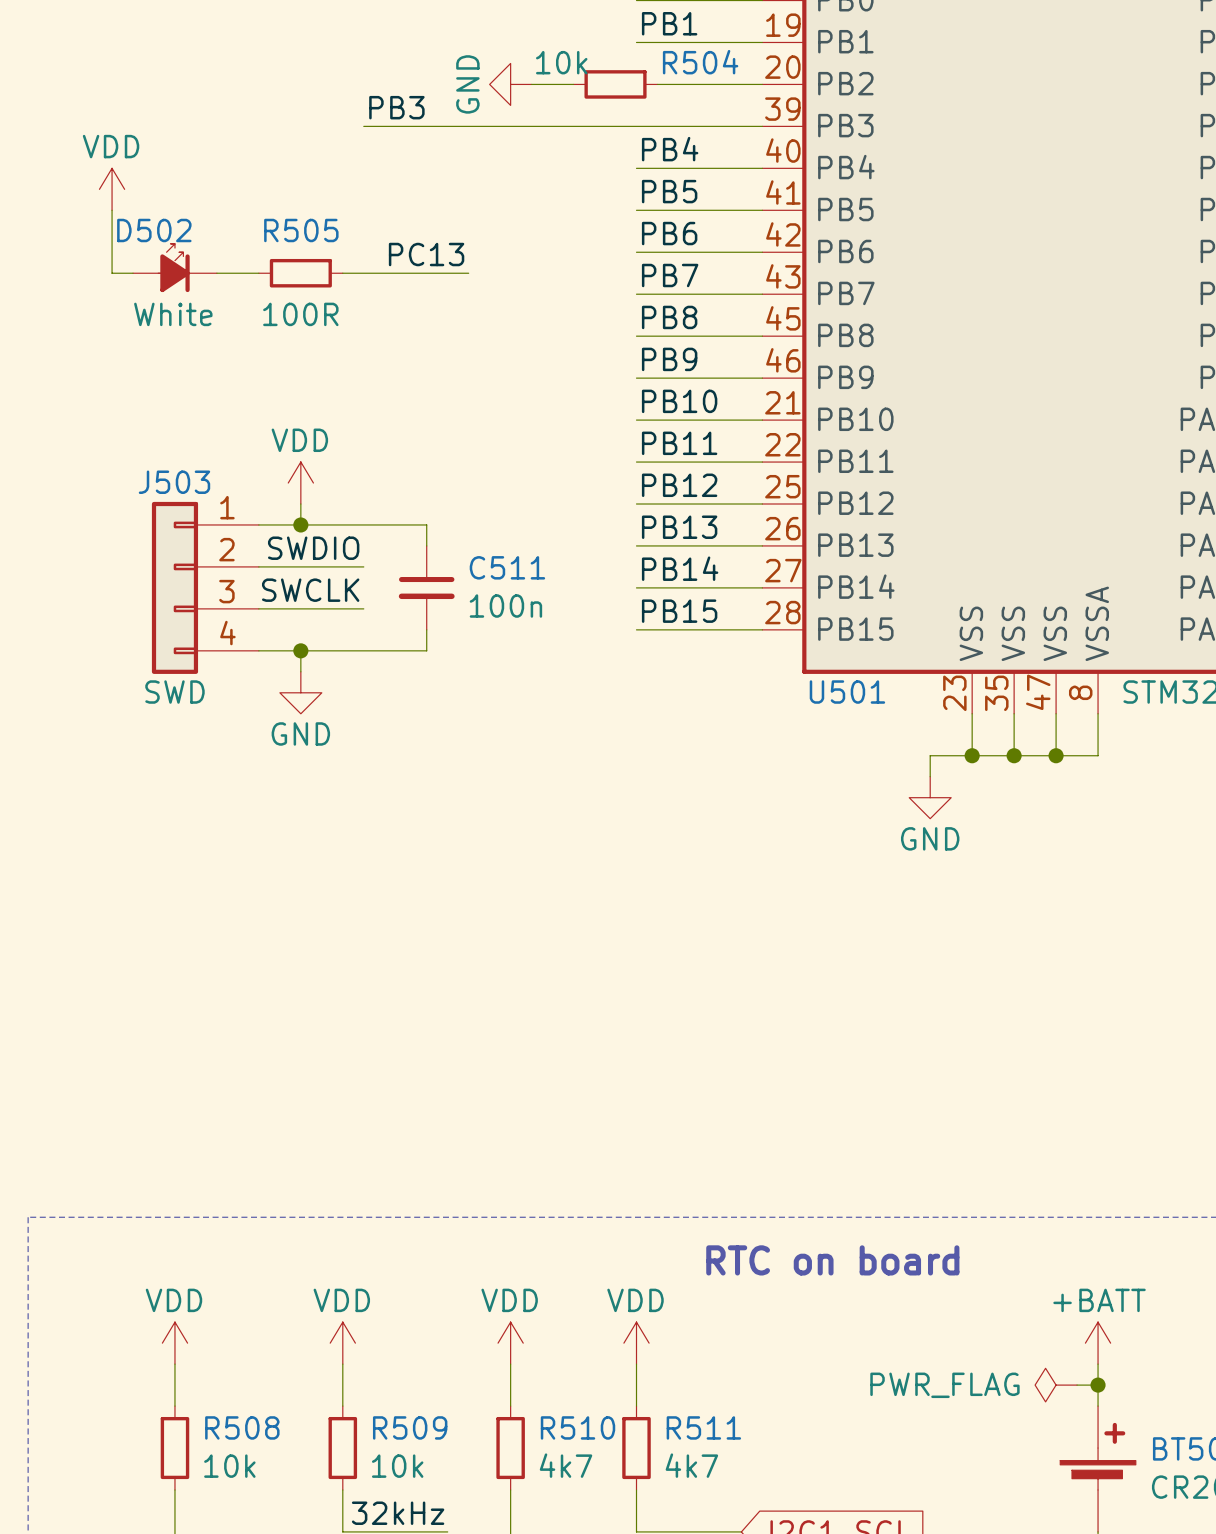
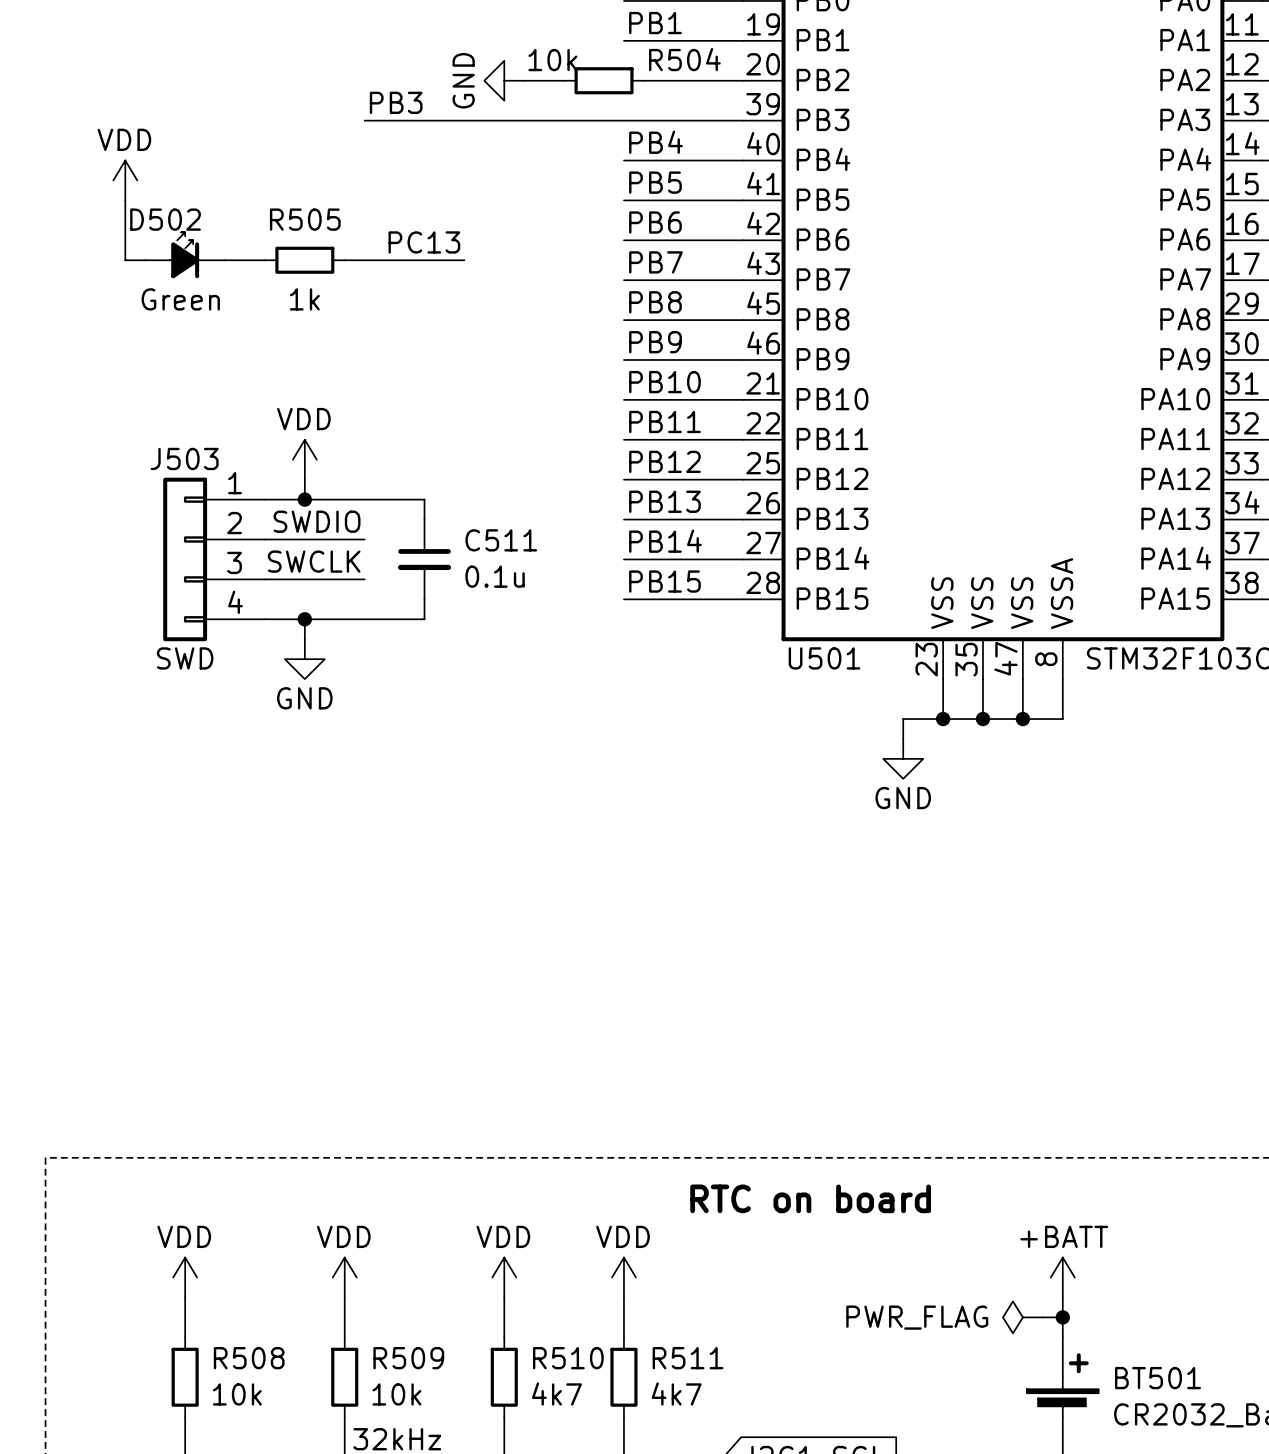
D502 value: White (173, 314) -> Green (180, 299)
R505 value: 100R (300, 314) -> 1k (304, 299)
C511 value: 100n (505, 606) -> 0.1u (495, 576)

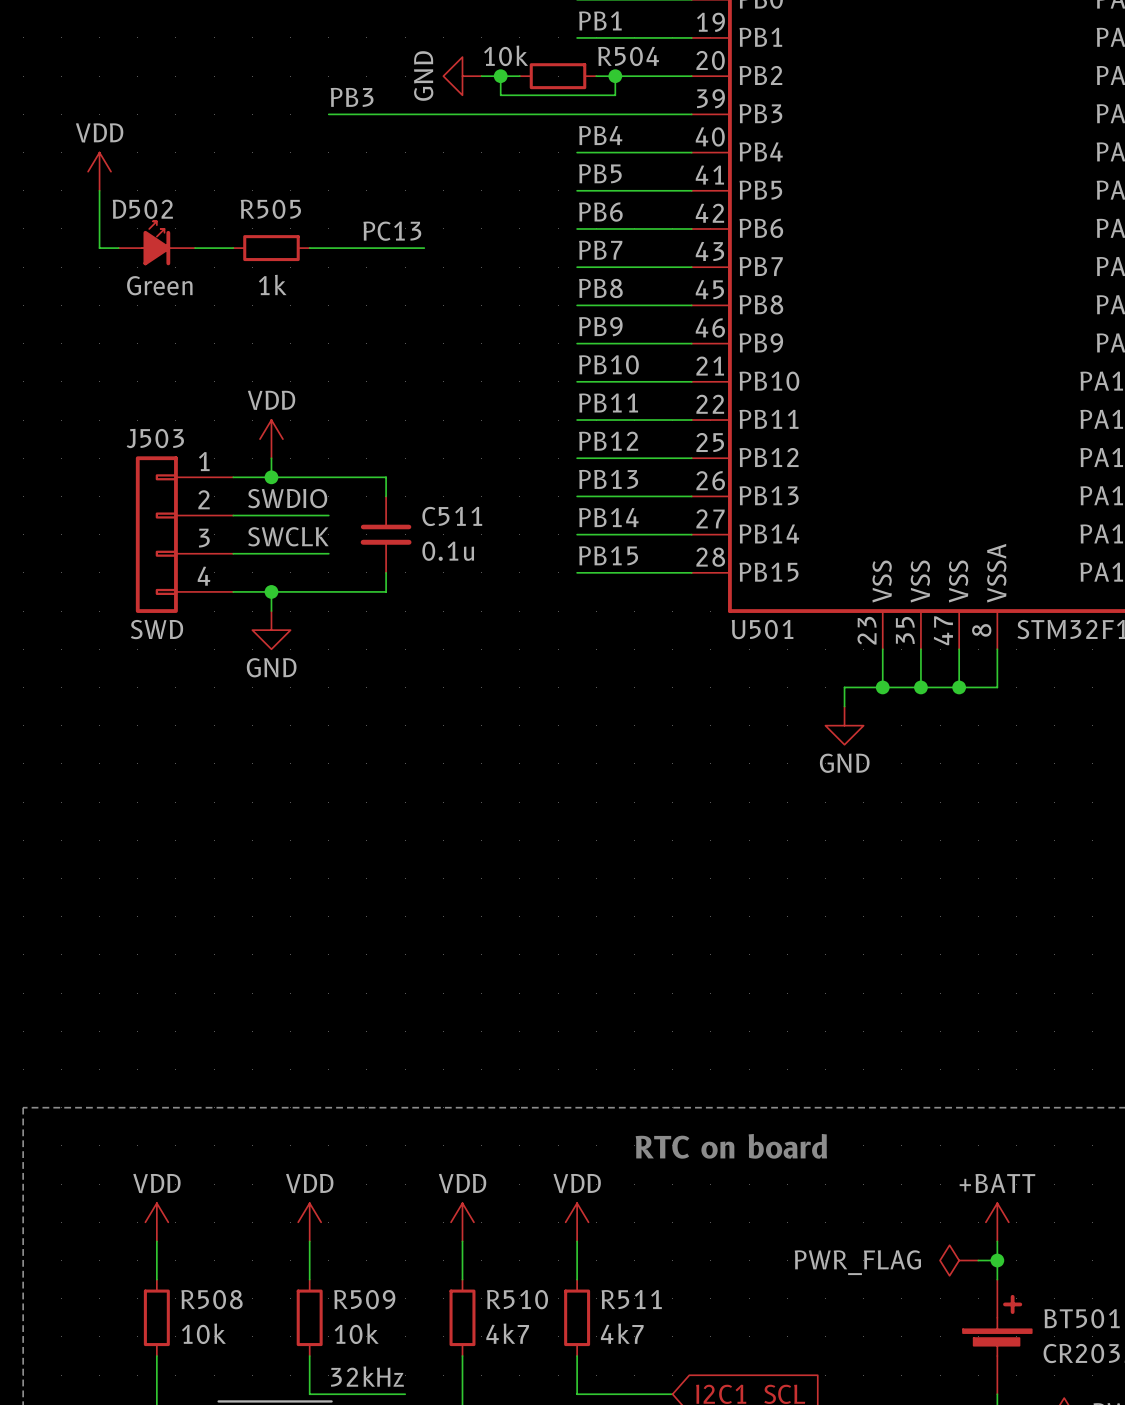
wire: none -> (500, 76) (500, 95) (615, 95) (615, 76)
junction: none -> (500, 76)
junction: none -> (615, 76)

